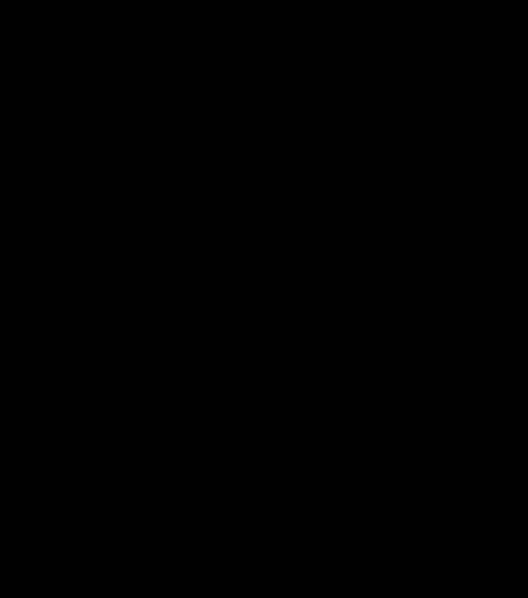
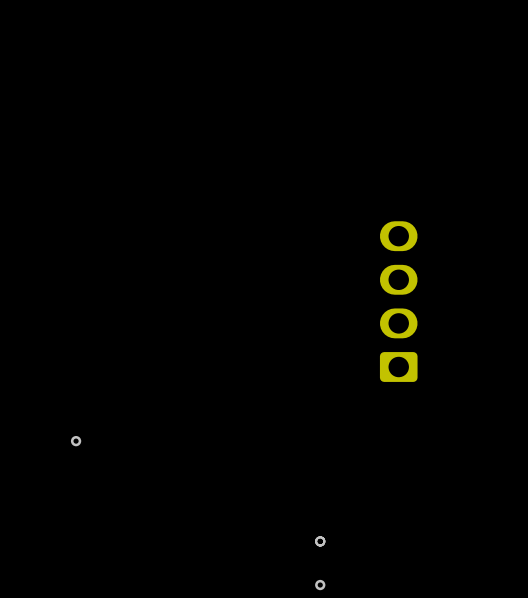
part: none -> (398, 301)
via: none -> (76, 441)
via: none -> (320, 541)
via: none -> (320, 585)

